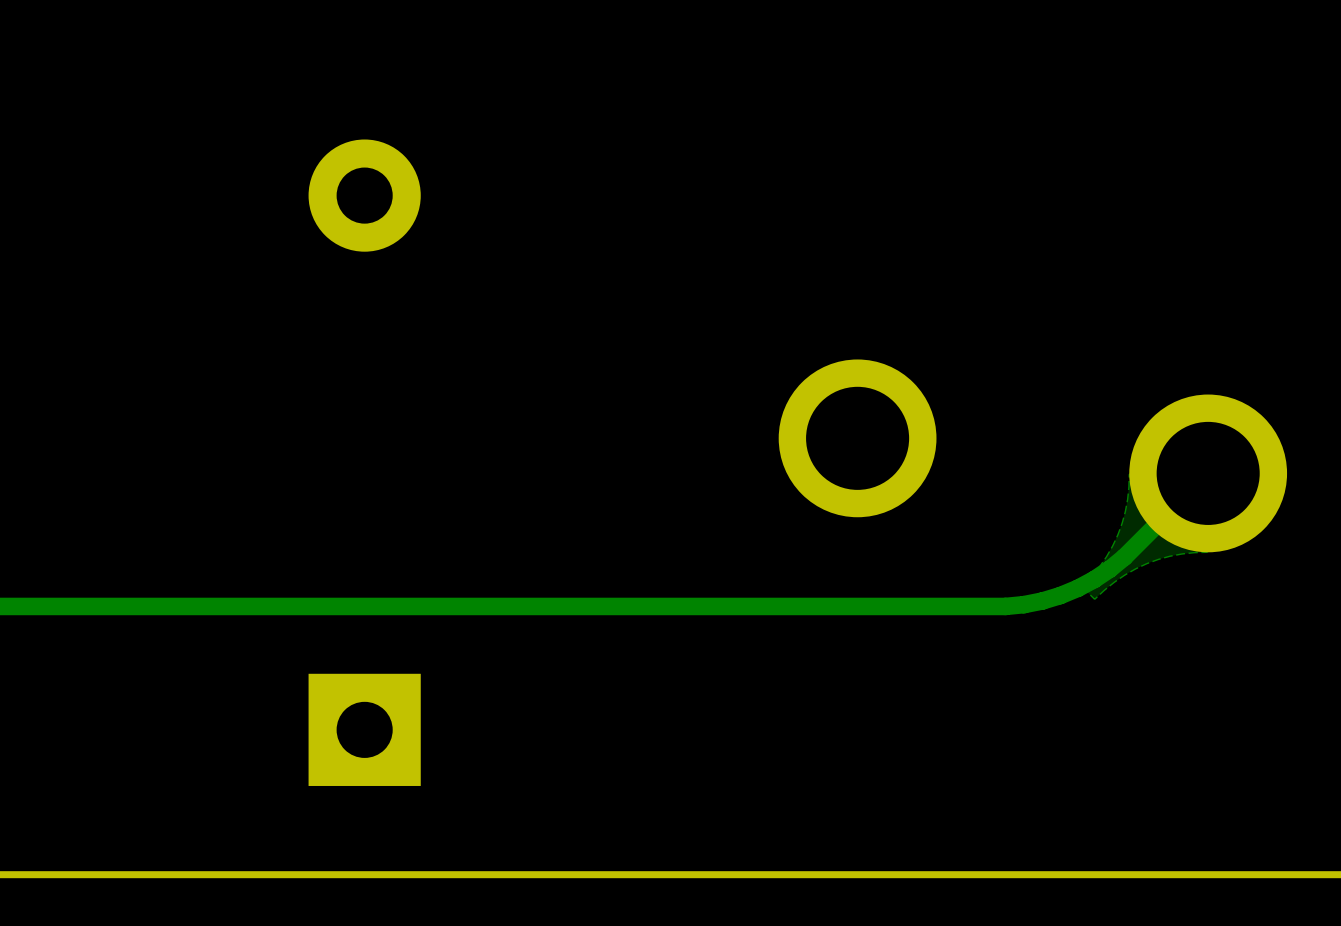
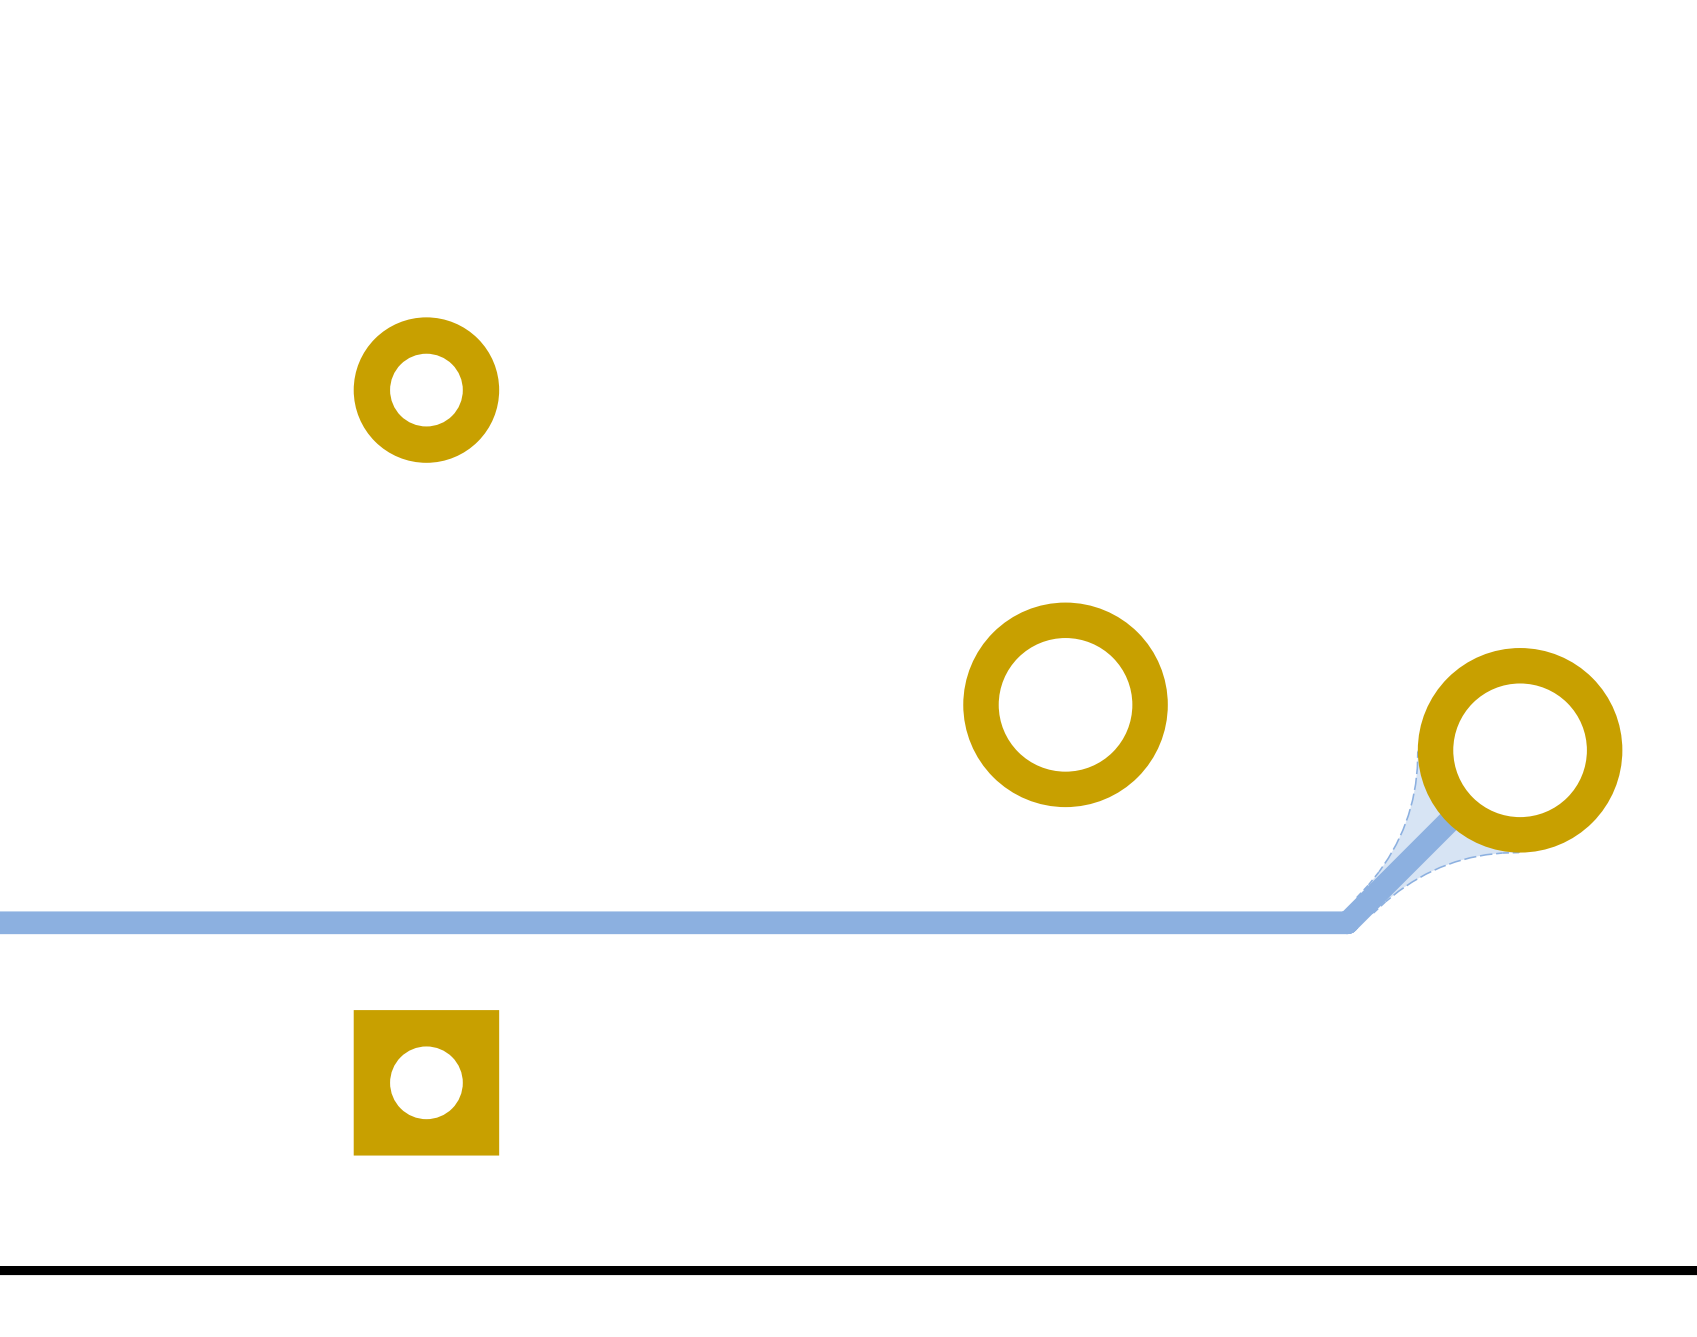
track: (1124, 557) (1109, 569) (1077, 588) (1042, 600) (1005, 606) -> (1411, 858) (1347, 922) (1257, 922)

